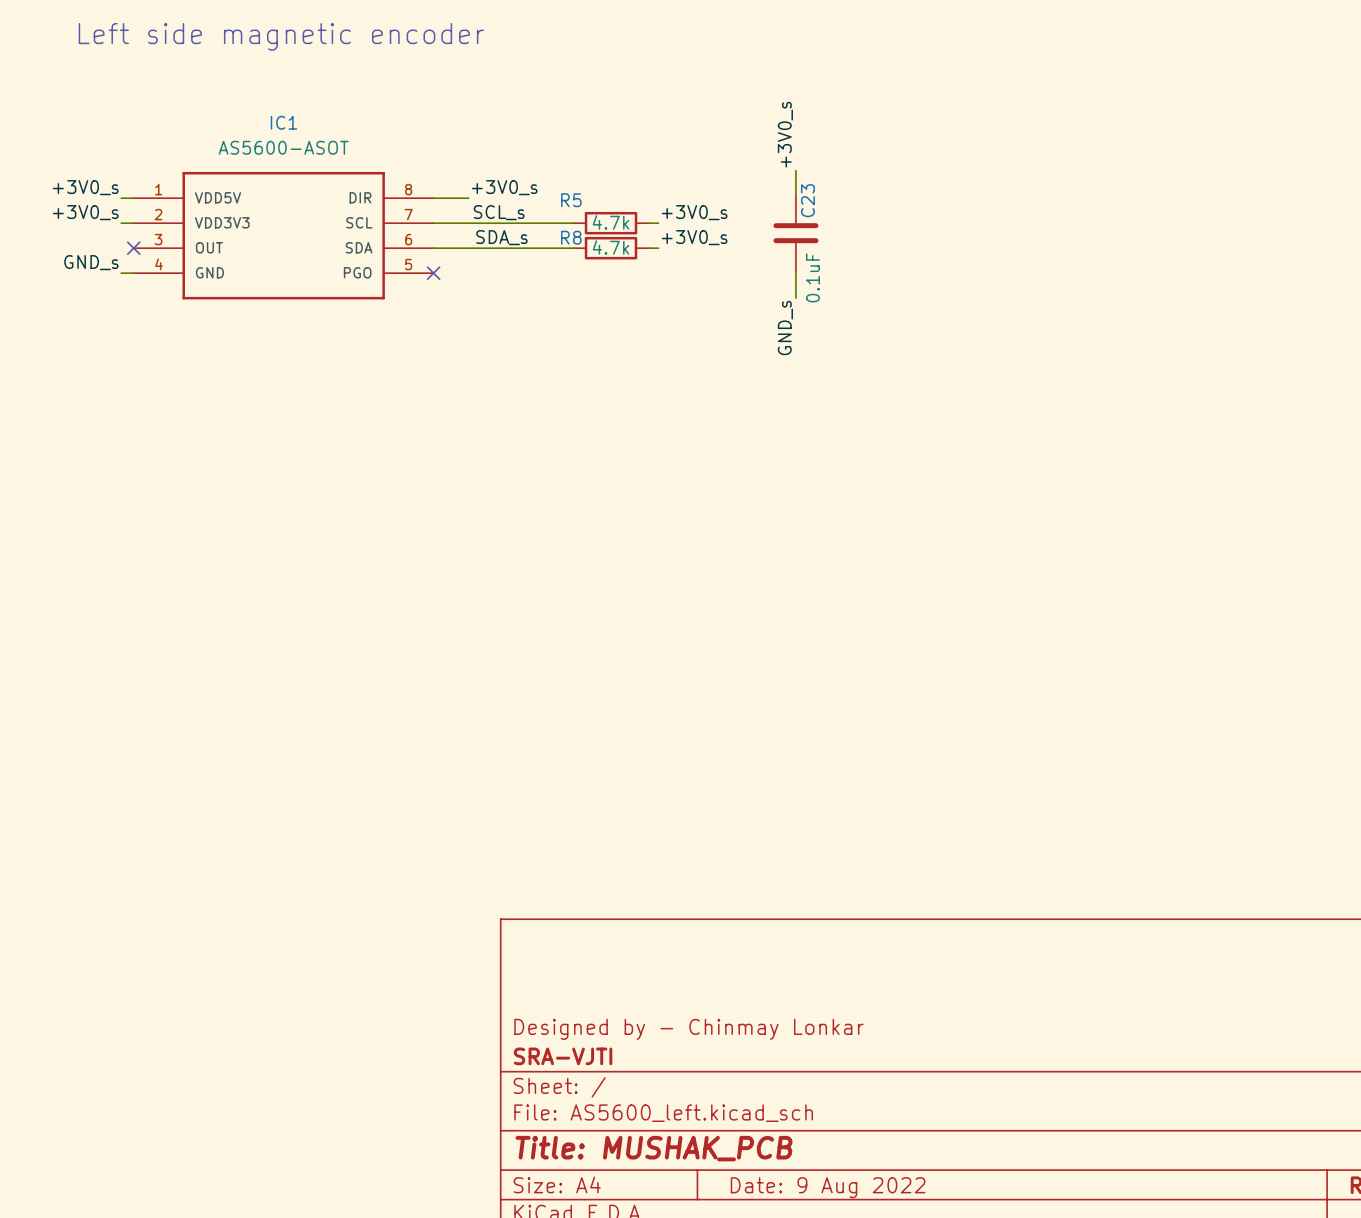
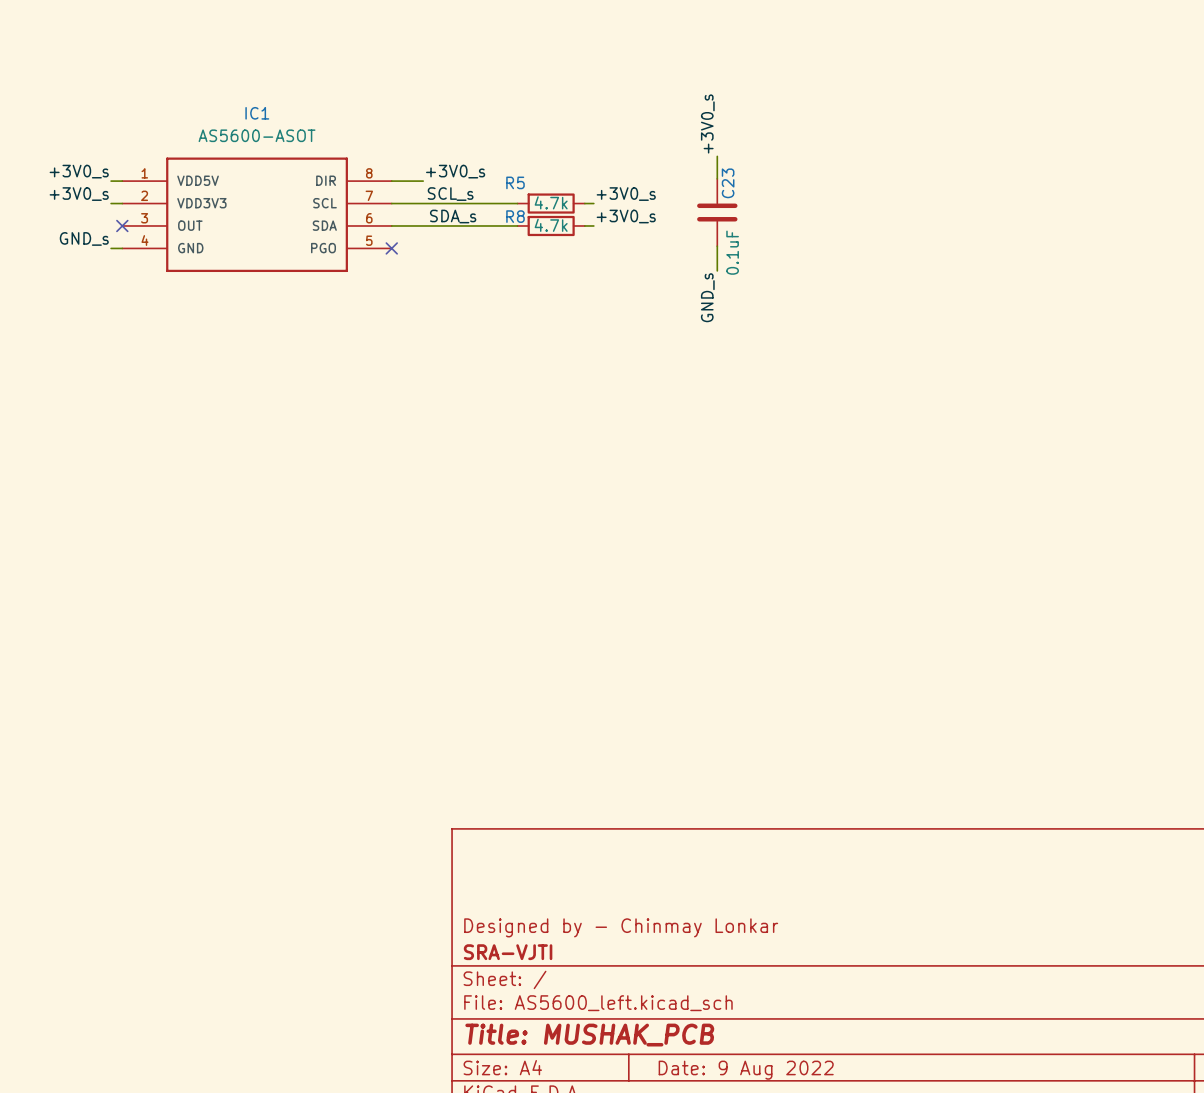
text: Left side magnetic encoder (281, 36) -> none

